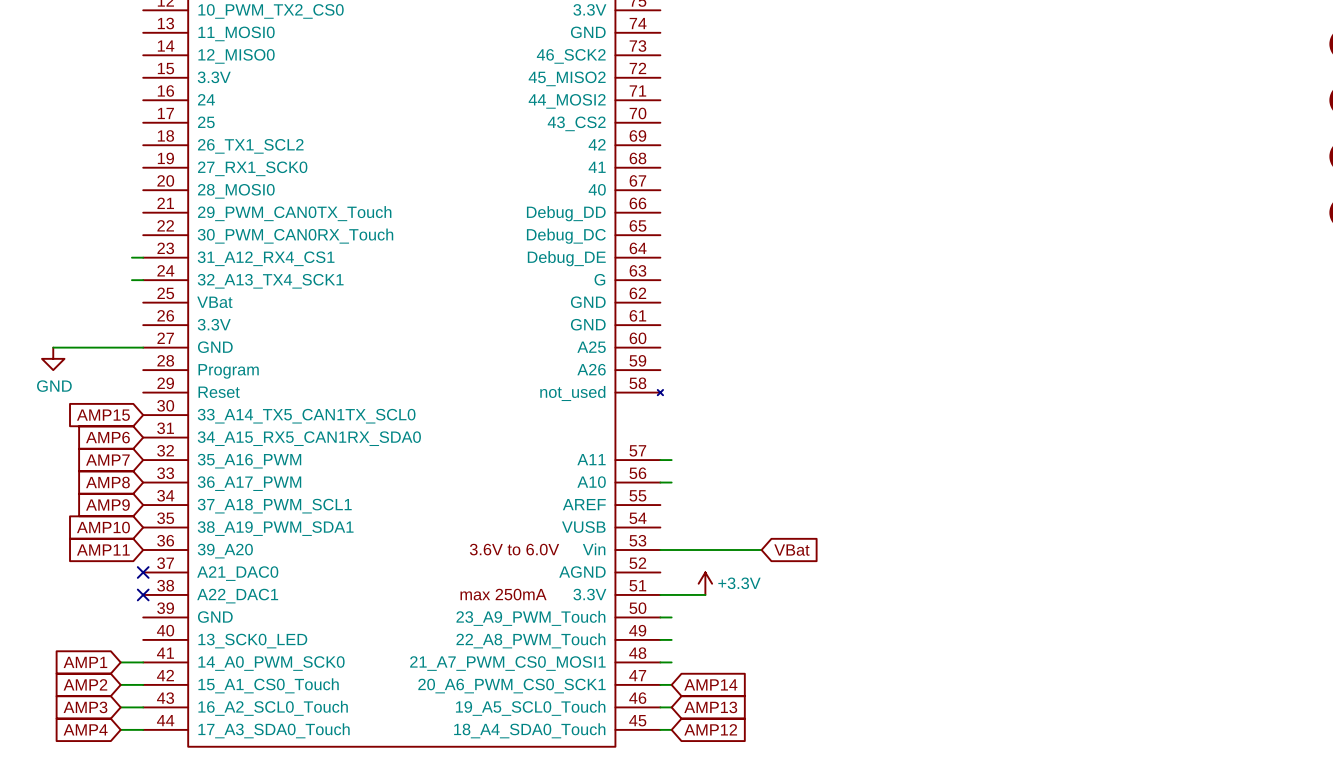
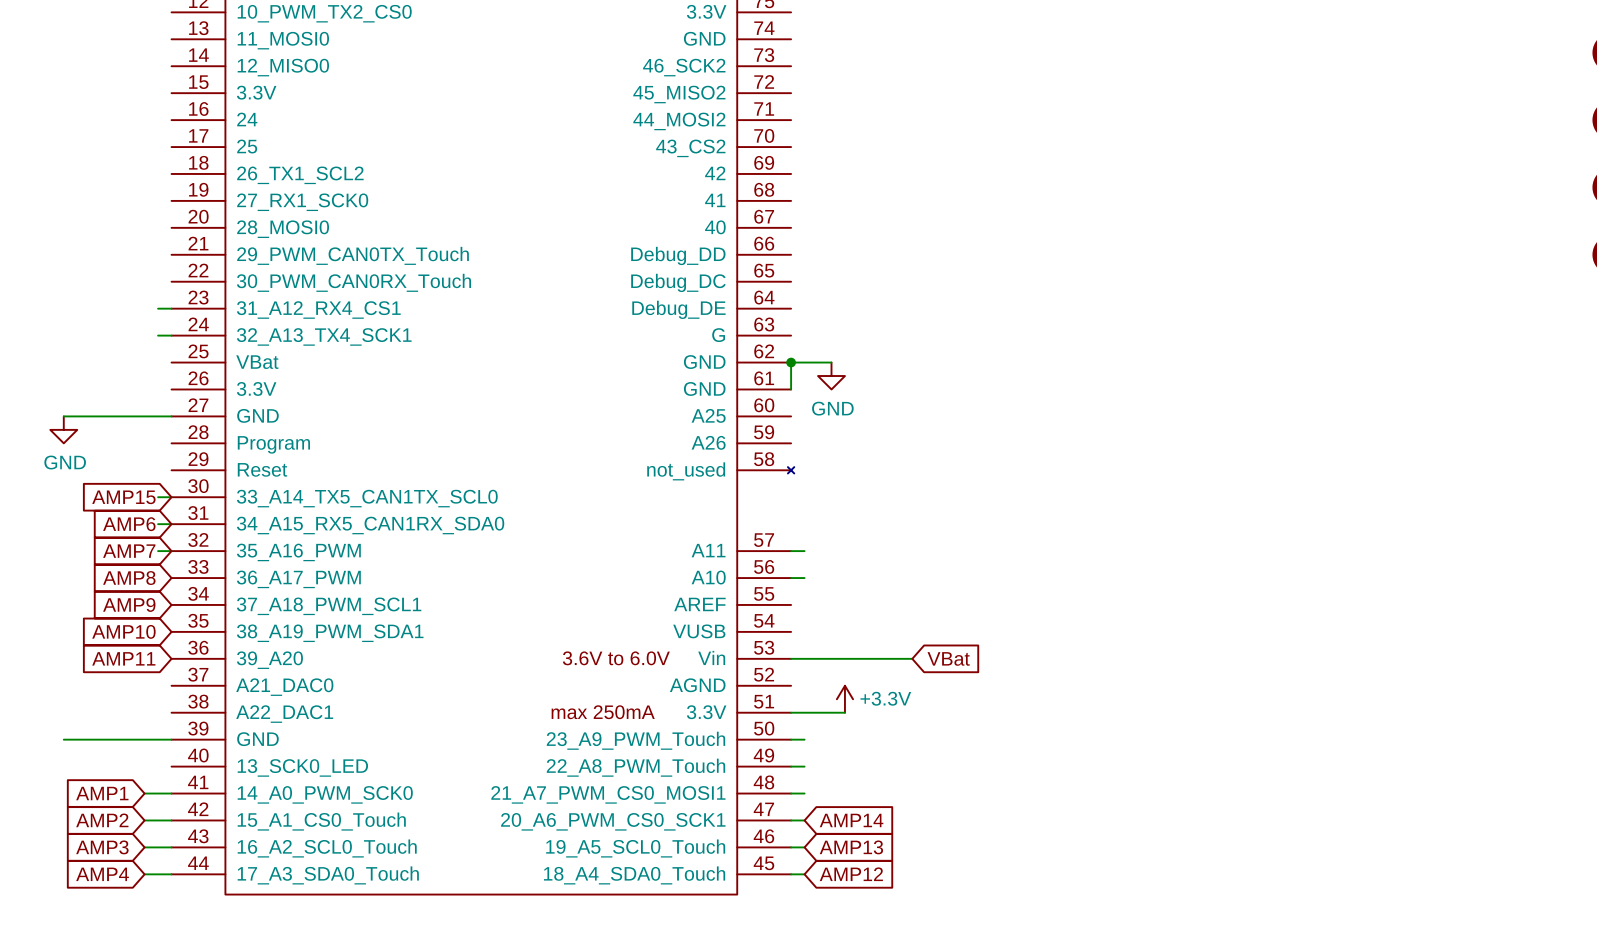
junction: none -> (791, 362)
wire: none -> (831, 362) (791, 362) (791, 389)
power symbol: none -> GND (831, 376)
wire: none -> (158, 497) (171, 497)
wire: none -> (158, 524) (171, 524)
wire: none -> (158, 551) (171, 551)
no-connect mark: (143, 572) -> none
no-connect mark: (143, 594) -> none
wire: none -> (63, 739) (171, 739)

